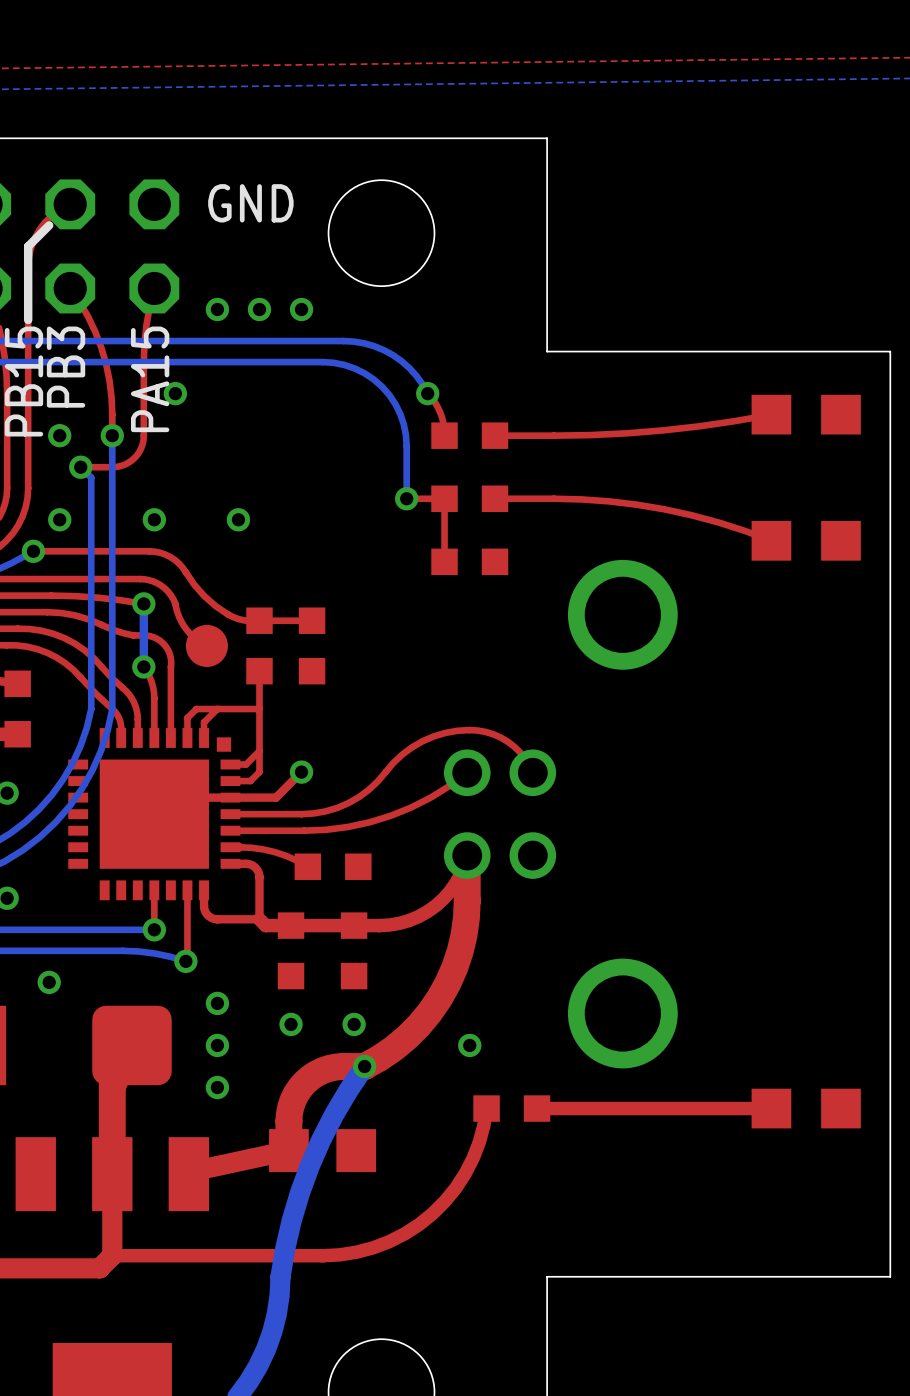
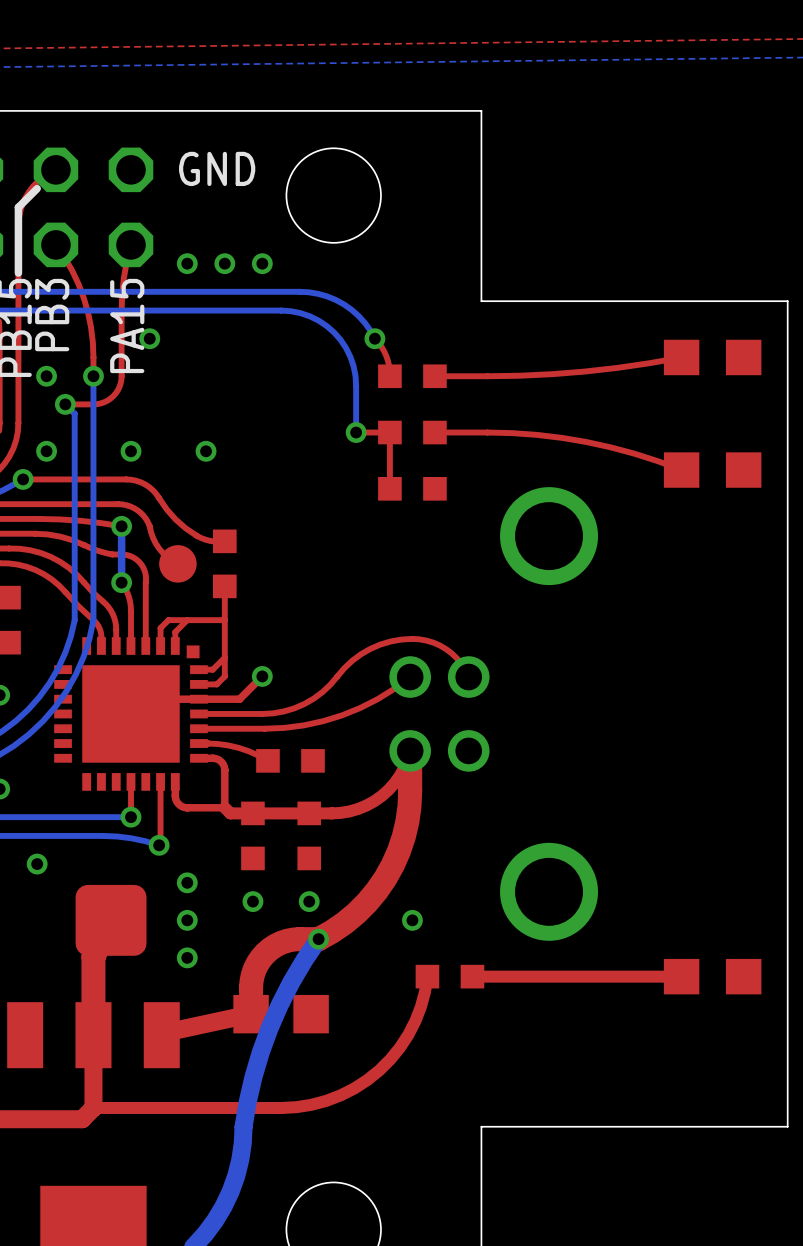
top track: (312, 620) (259, 620) -> none
part: (312, 645) -> none

